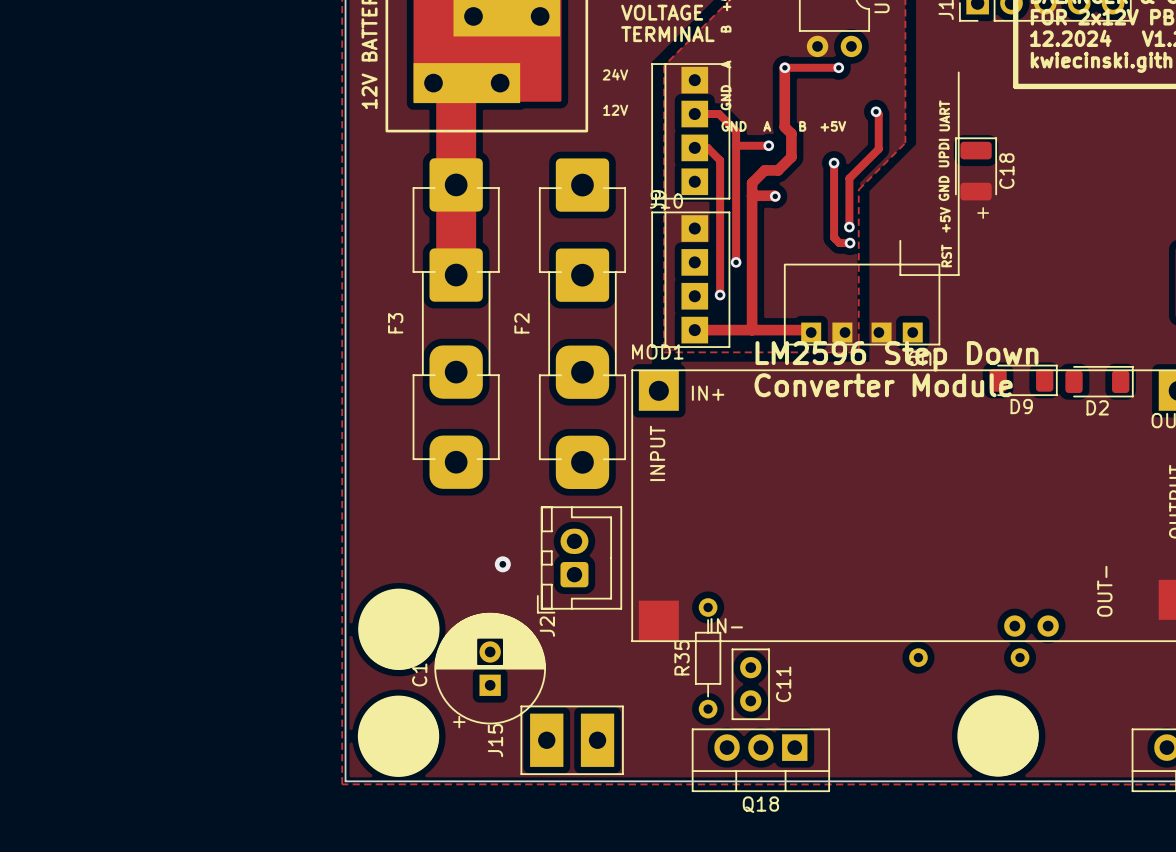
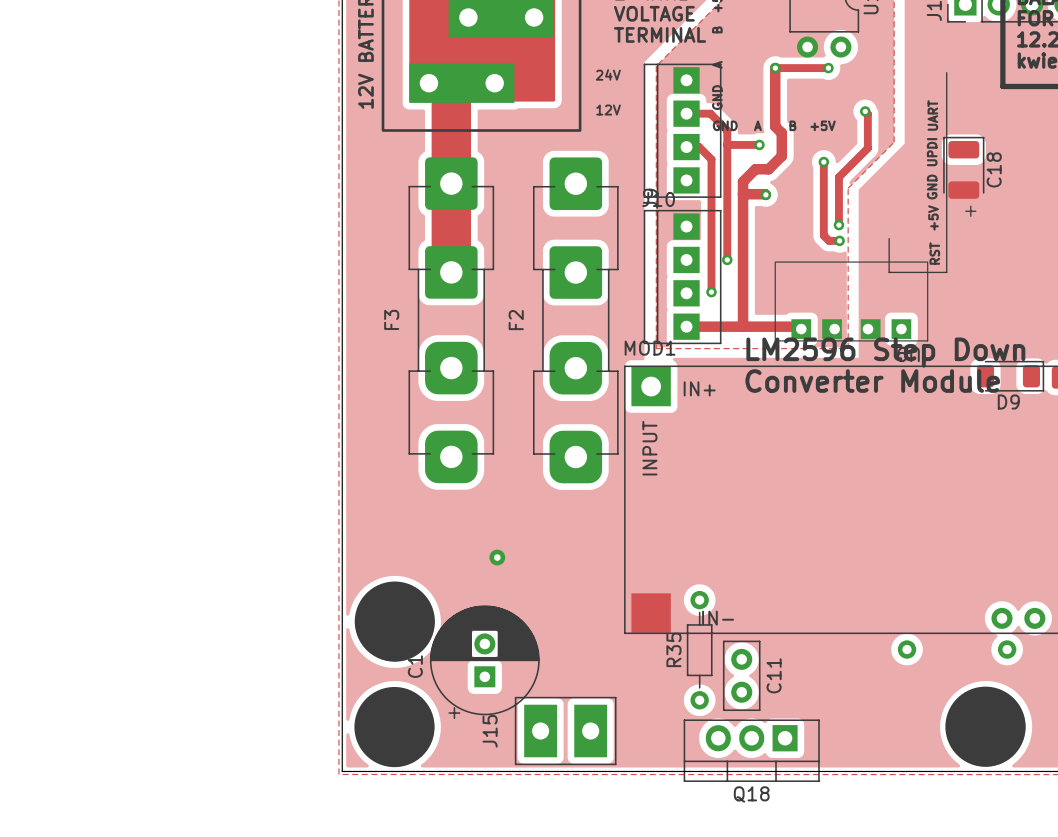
J2: (579, 559) -> none

